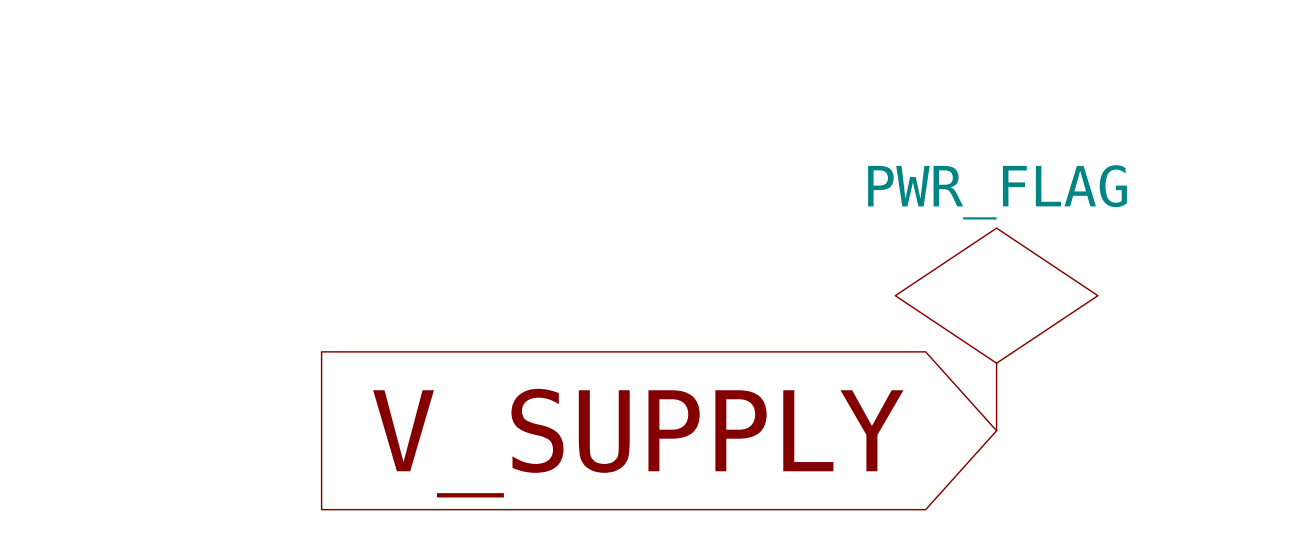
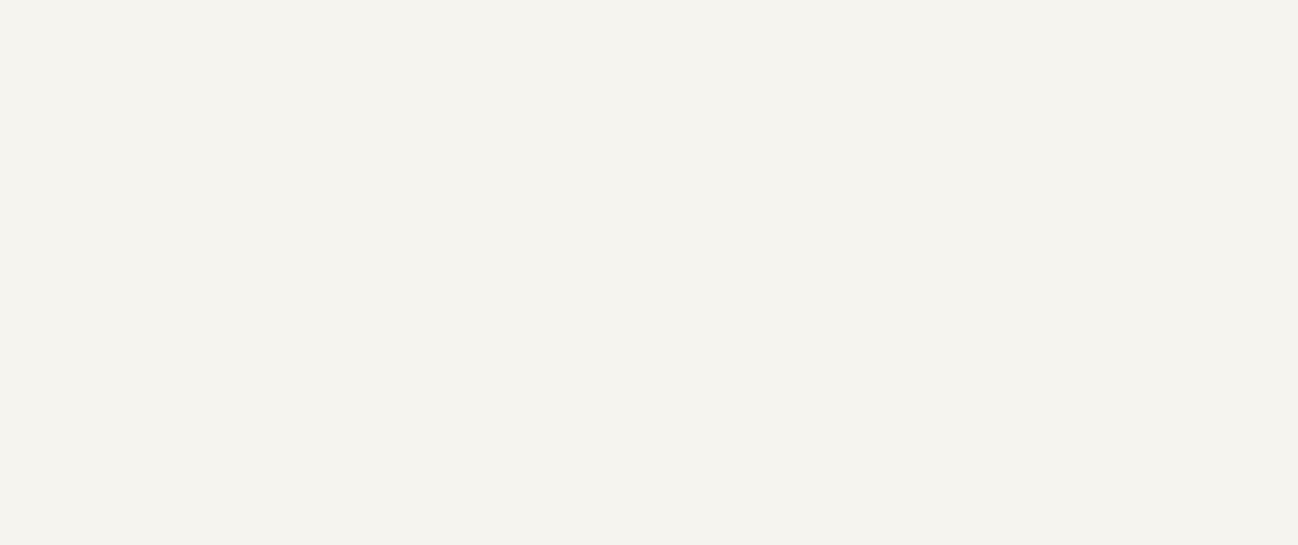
power symbol: PWR_FLAG (996, 329) -> none
global label: V_SUPPLY (638, 443) -> none

